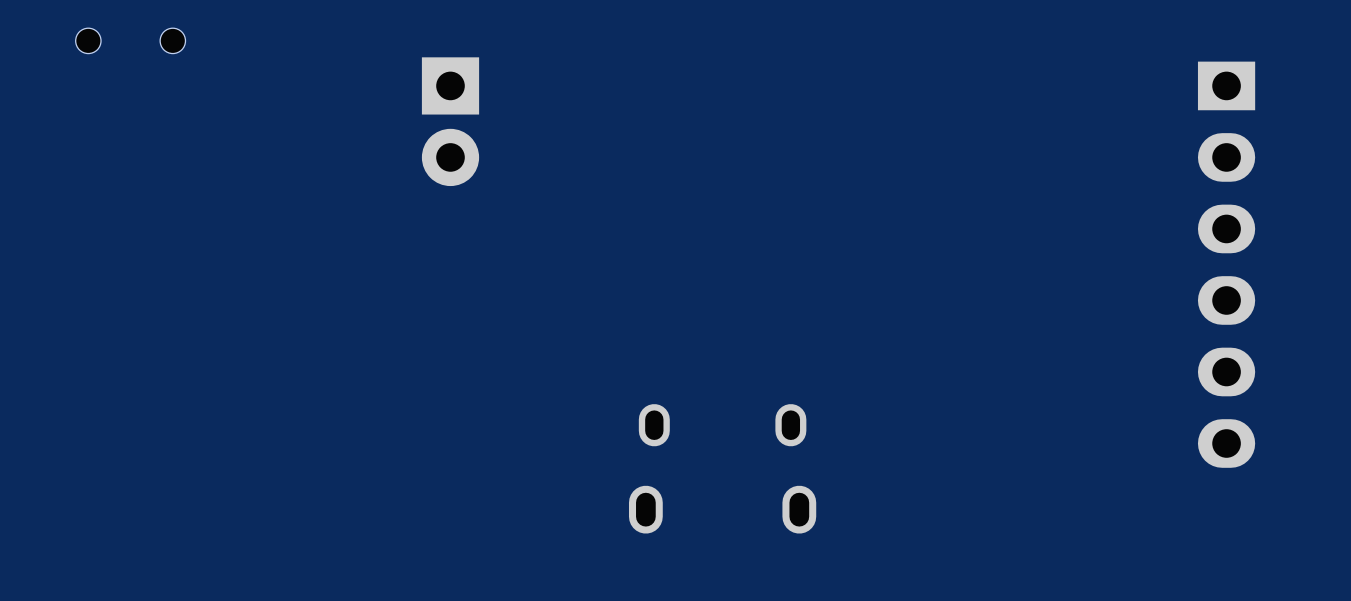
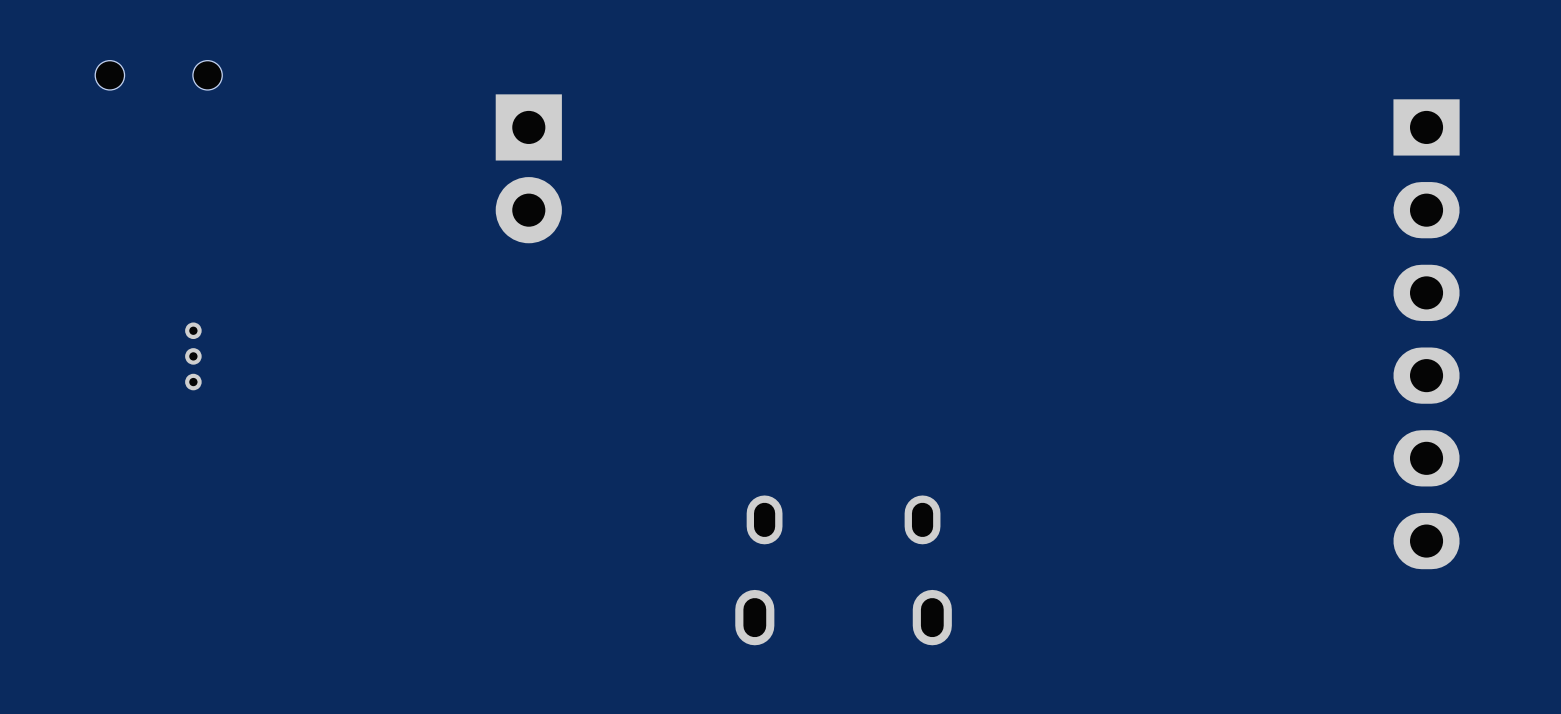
part: none -> (193, 356)

